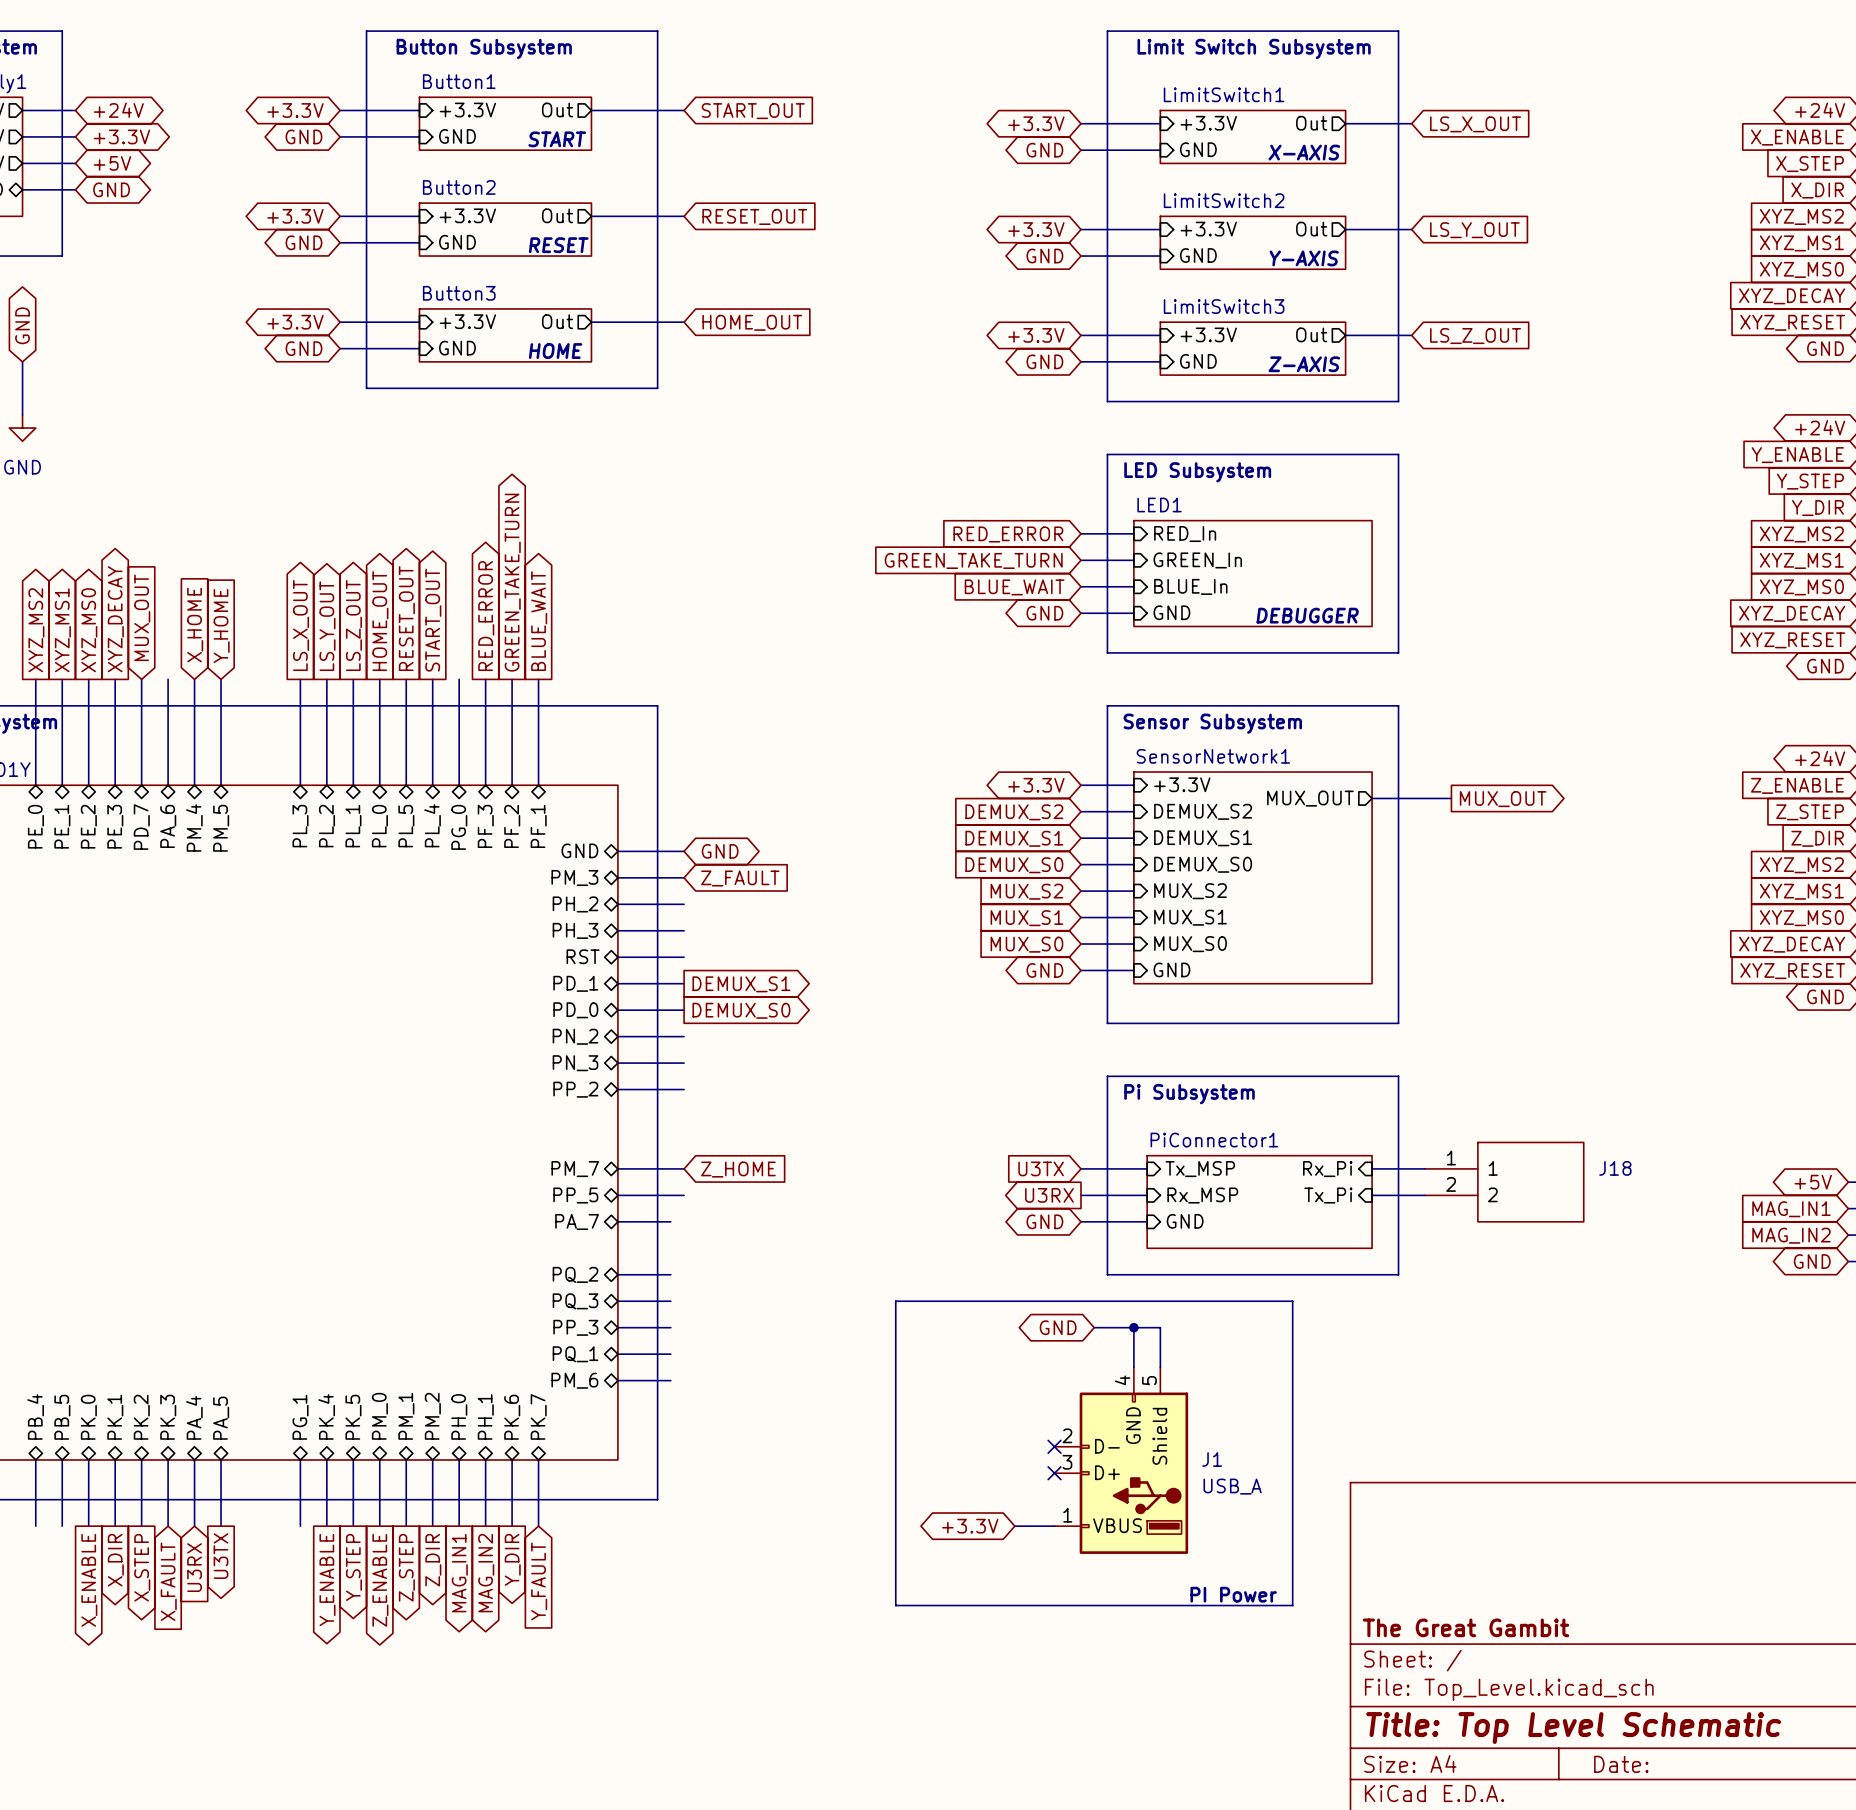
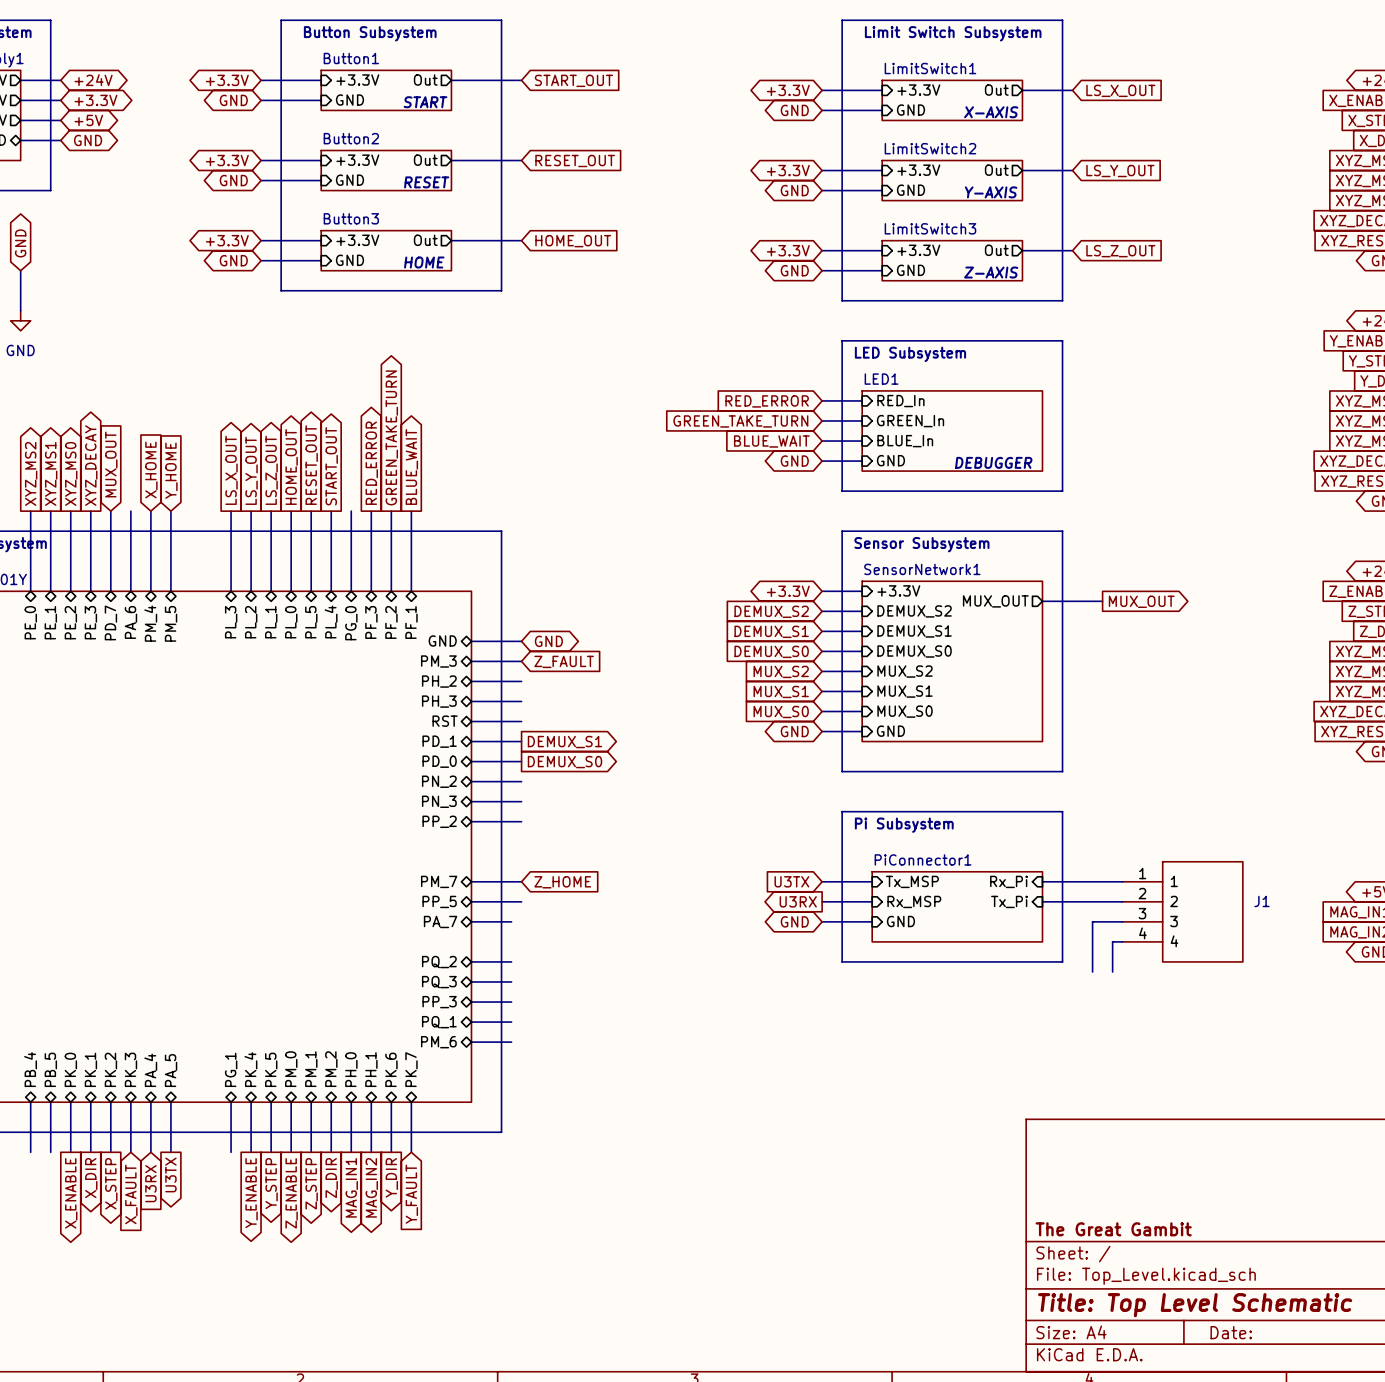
J18: (1504, 1182) -> none
wire: none -> (1122, 921) (1092, 921) (1092, 971)
wire: none -> (1122, 941) (1112, 941) (1112, 971)
line: (895, 1301) (895, 1605) (1292, 1605) (1292, 1301) (895, 1301) -> none
global label: GND (1058, 1327) -> none
wire: (1094, 1327) (1160, 1327) (1160, 1367) -> none
wire: (1133, 1327) (1133, 1367) -> none
junction: (1133, 1327) -> none
J1 symbol: [1054, 1367, 1189, 1554] -> [1122, 861, 1244, 963]
no-connect mark: (1054, 1446) -> none
no-connect mark: (1054, 1473) -> none
J1 value: USB_A (1232, 1486) -> none
global label: +3.3V (970, 1526) -> none
wire: (1014, 1526) (1054, 1526) -> none
text: PI Power (1233, 1594) -> none

